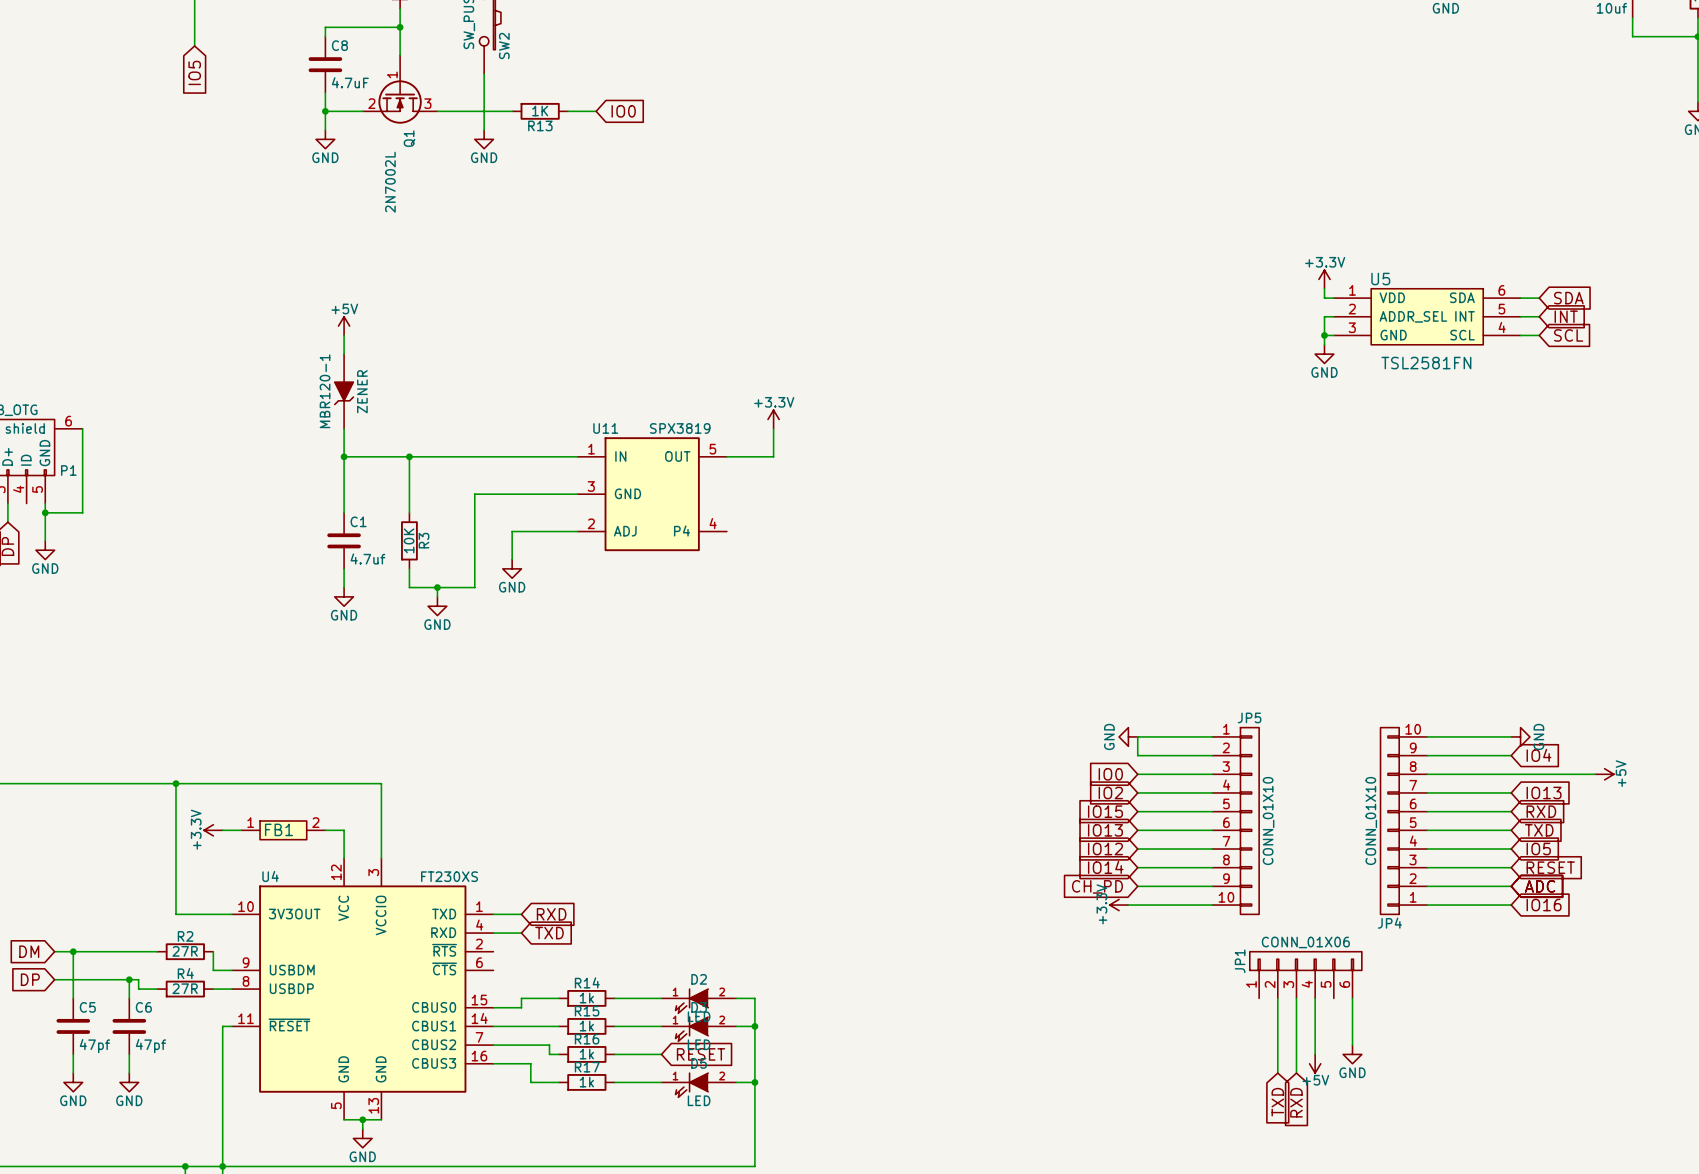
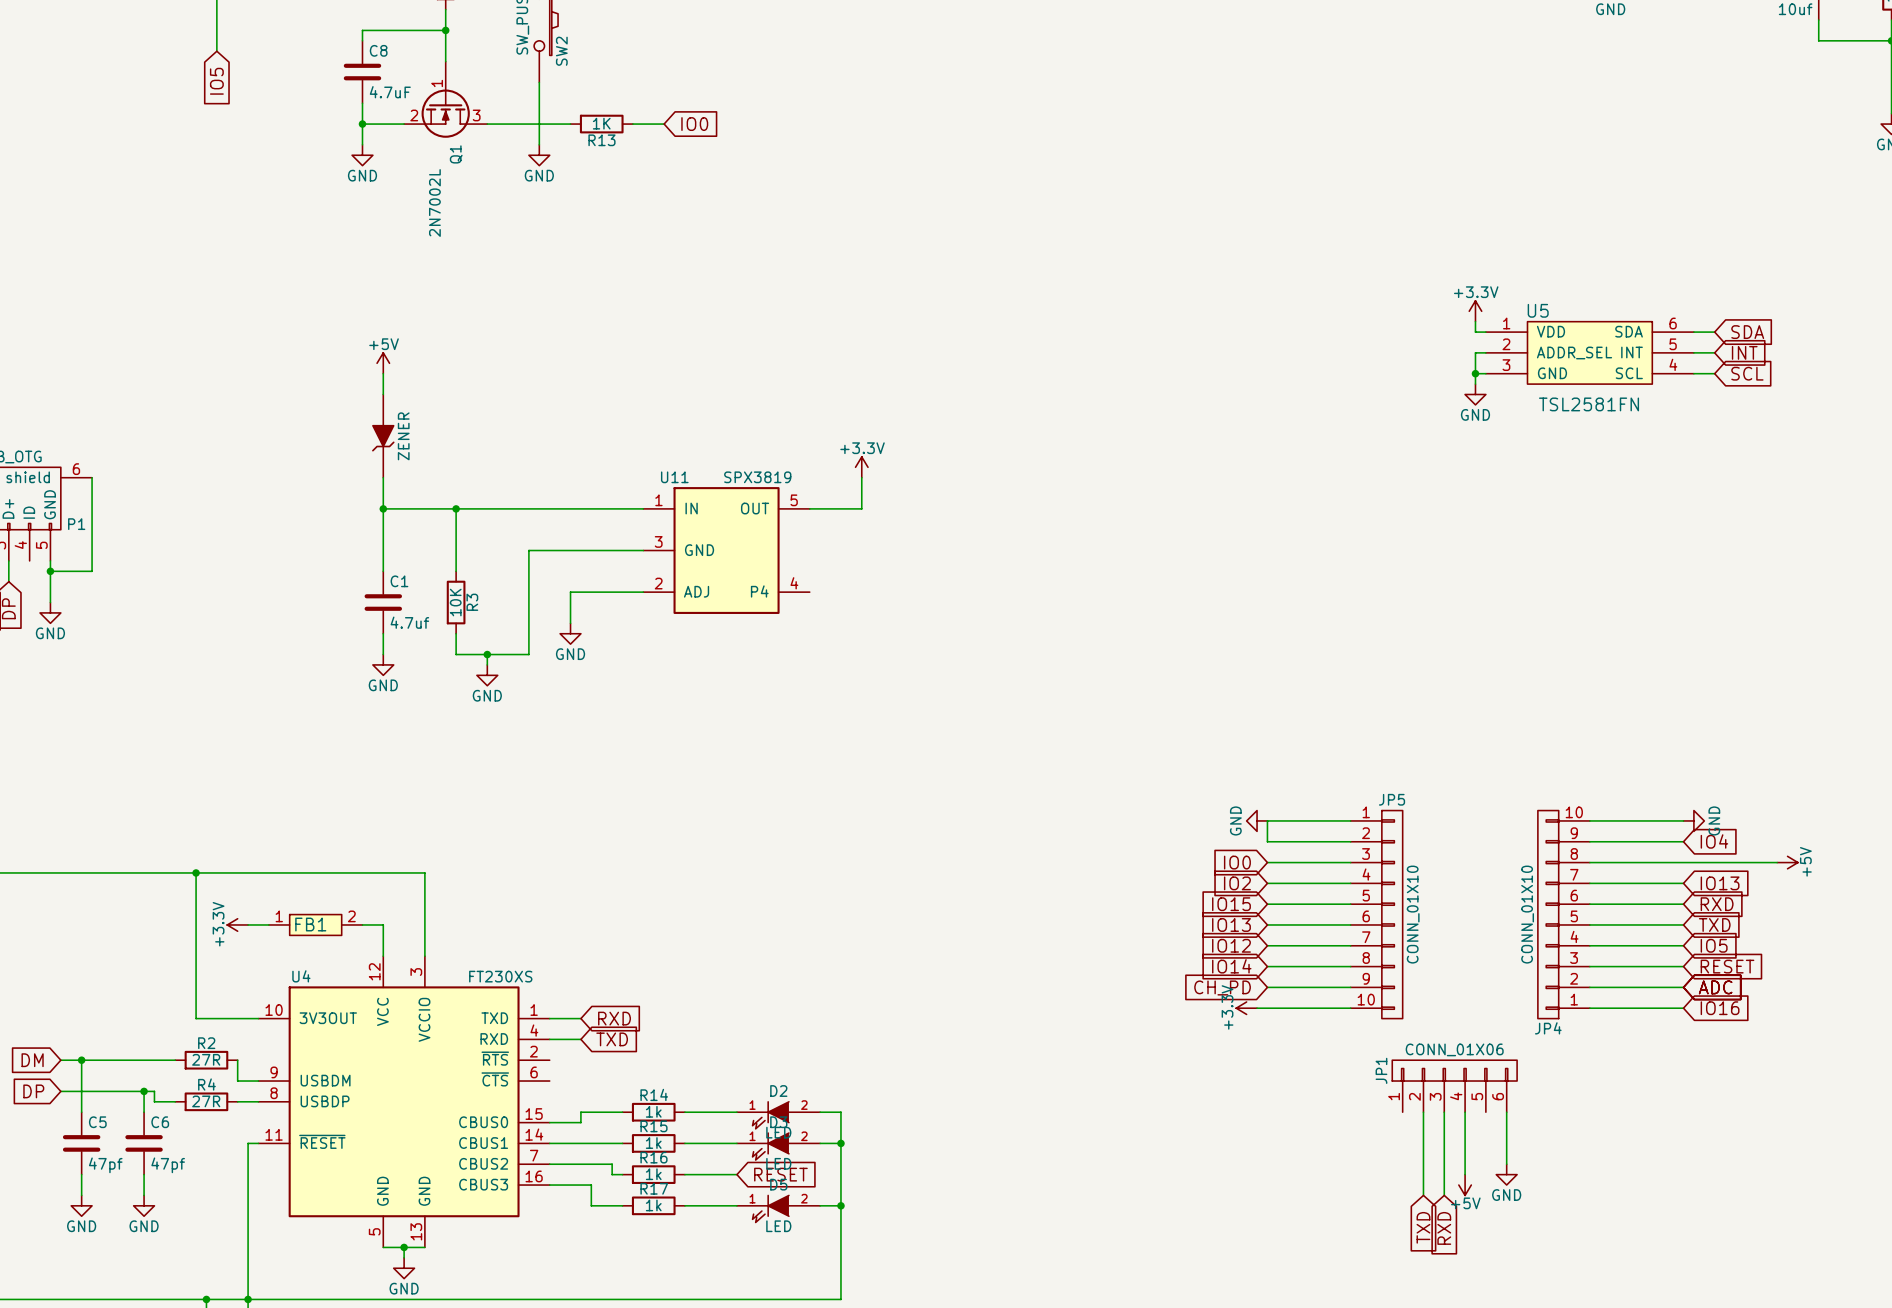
MBR120-1 name: MBR120-1 (325, 391) -> none

